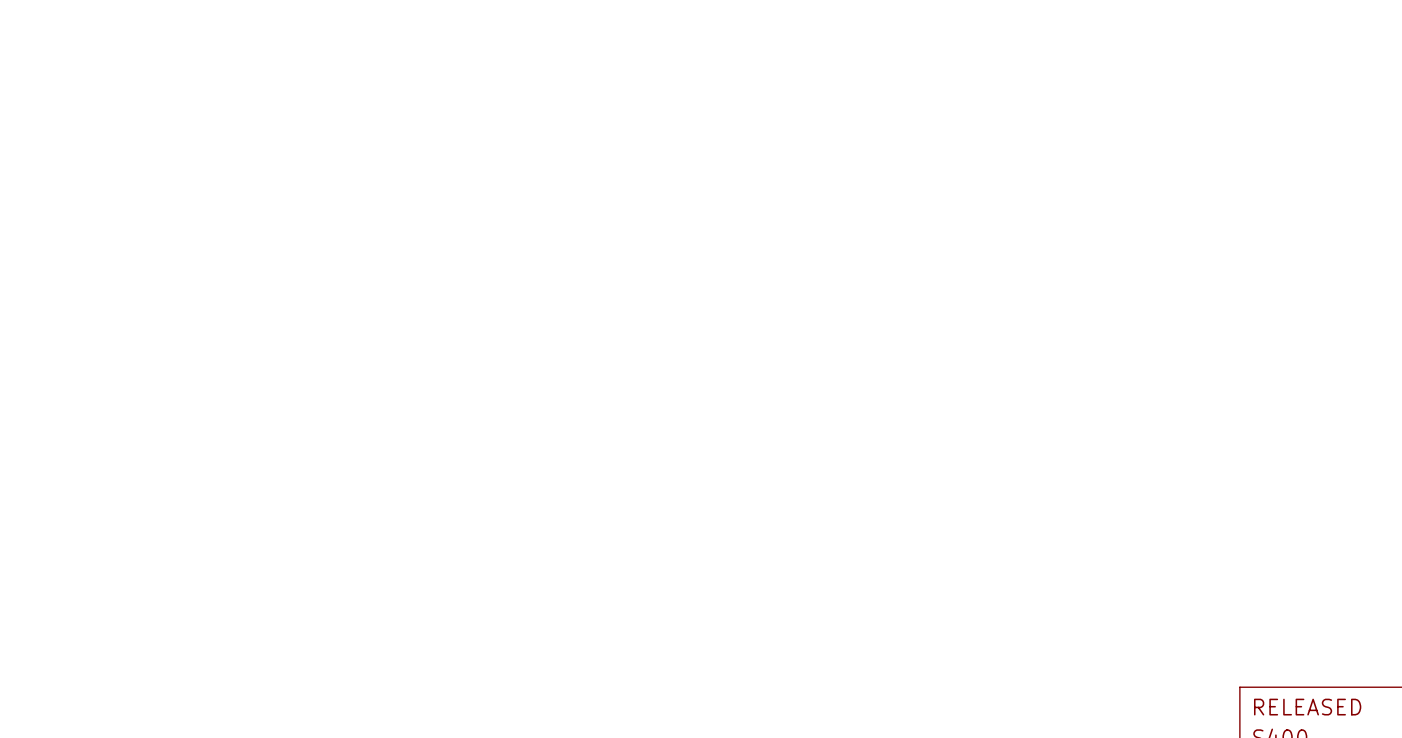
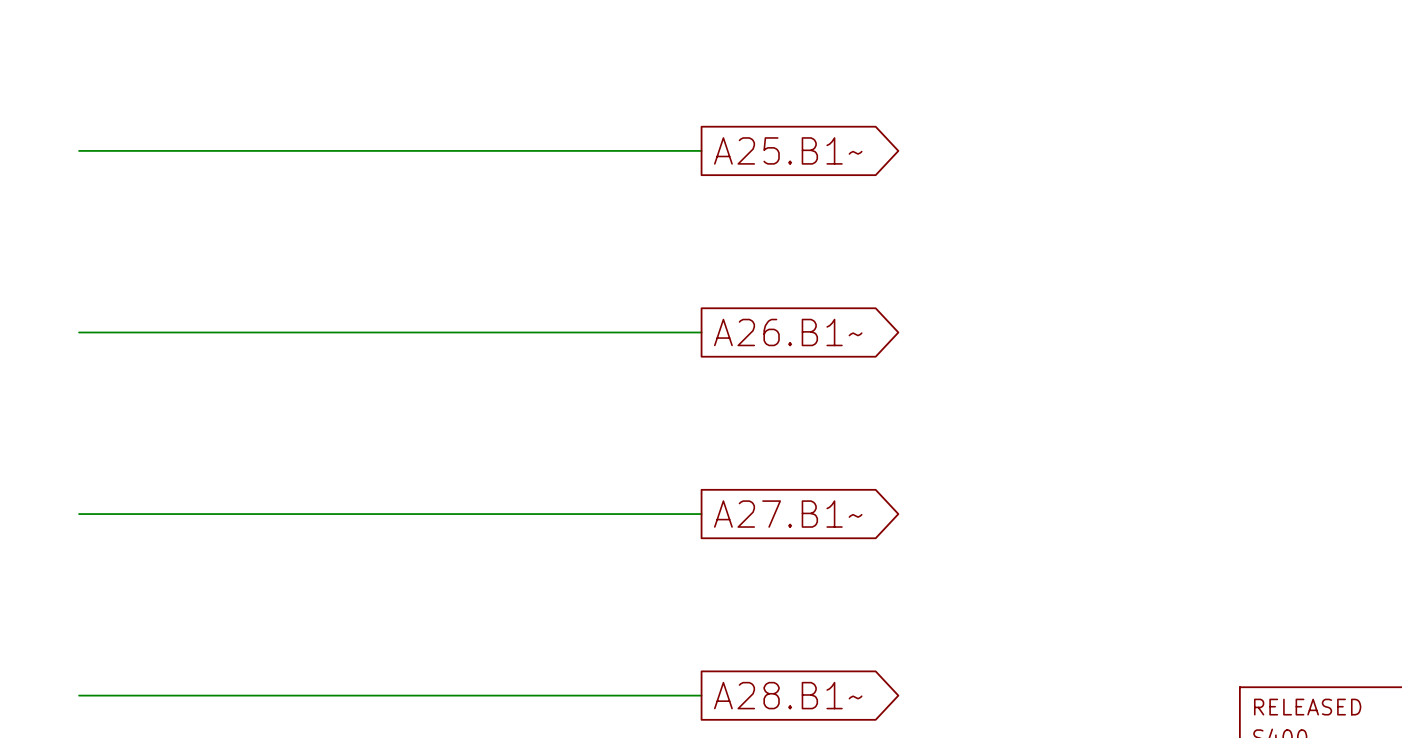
wire: none -> (79, 150) (701, 150)
global label: none -> A25.B1~ (788, 150)
wire: none -> (79, 332) (701, 332)
global label: none -> A26.B1~ (788, 332)
wire: none -> (79, 514) (701, 514)
global label: none -> A27.B1~ (788, 514)
wire: none -> (79, 695) (701, 695)
global label: none -> A28.B1~ (788, 695)

